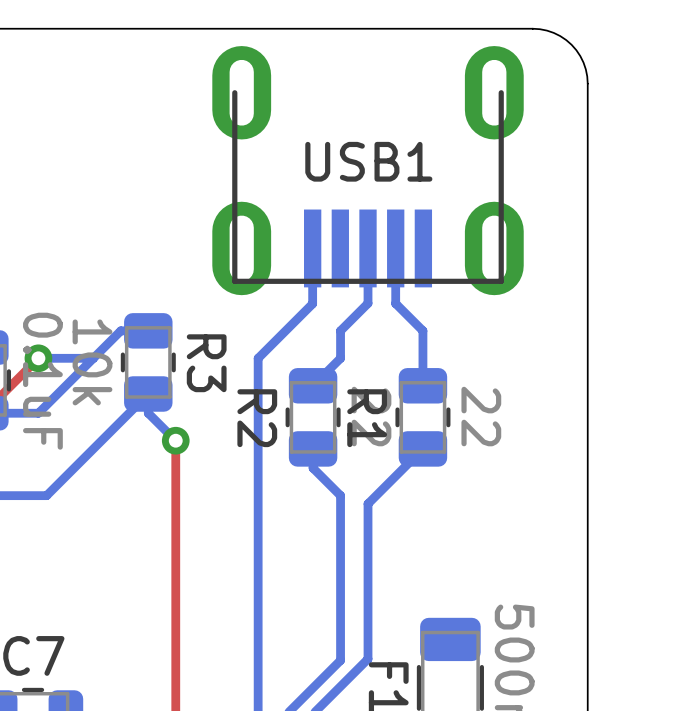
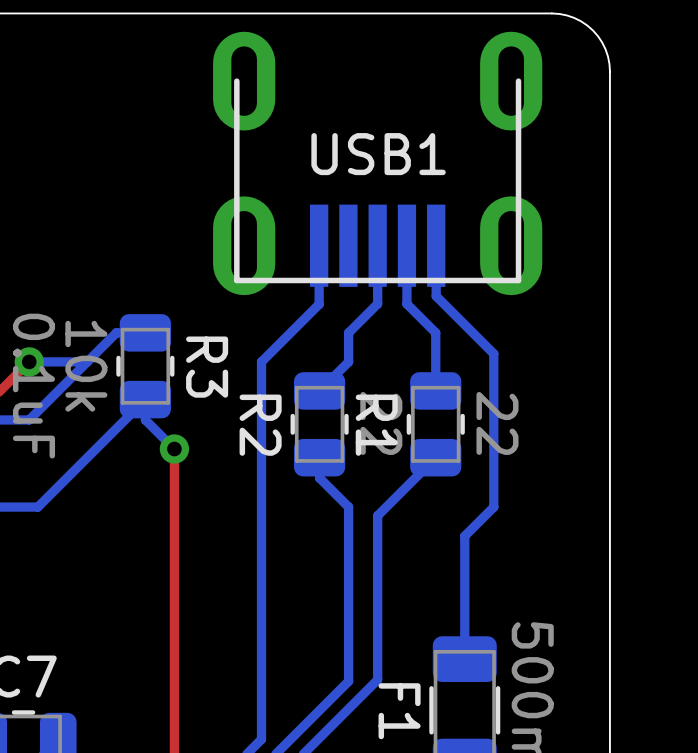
bottom track: none -> (436, 245) (436, 296) (493, 353) (493, 507) (464, 536) (464, 659)

